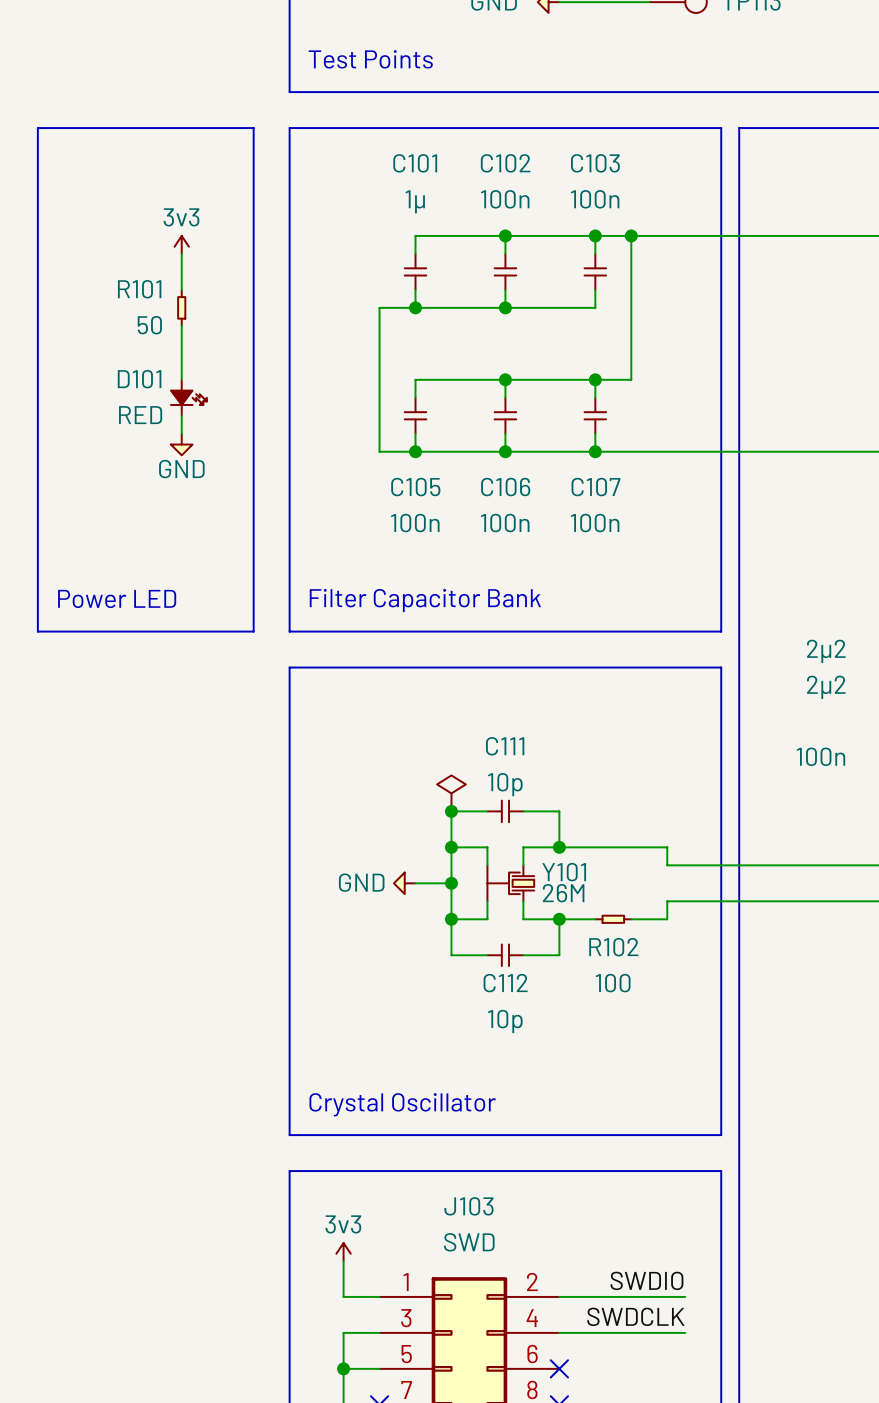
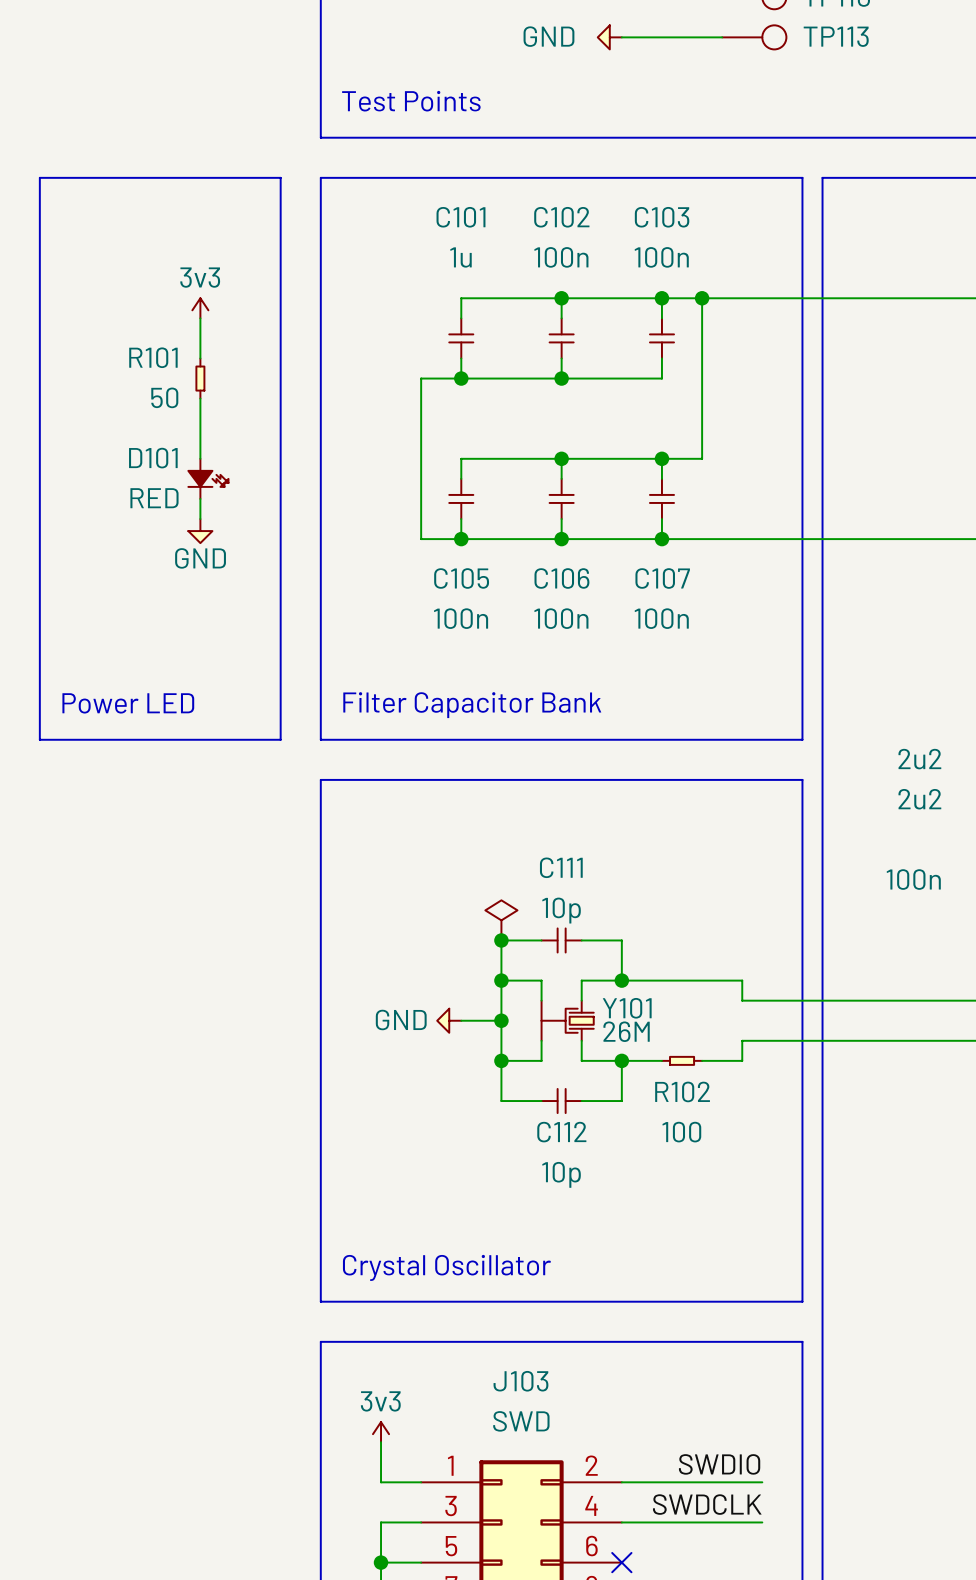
C101 value: 1µ (415, 201) -> 1u (460, 257)
part value: 2µ2 (826, 651) -> 2u2 (919, 759)
part value: 2µ2 (826, 687) -> 2u2 (919, 799)

